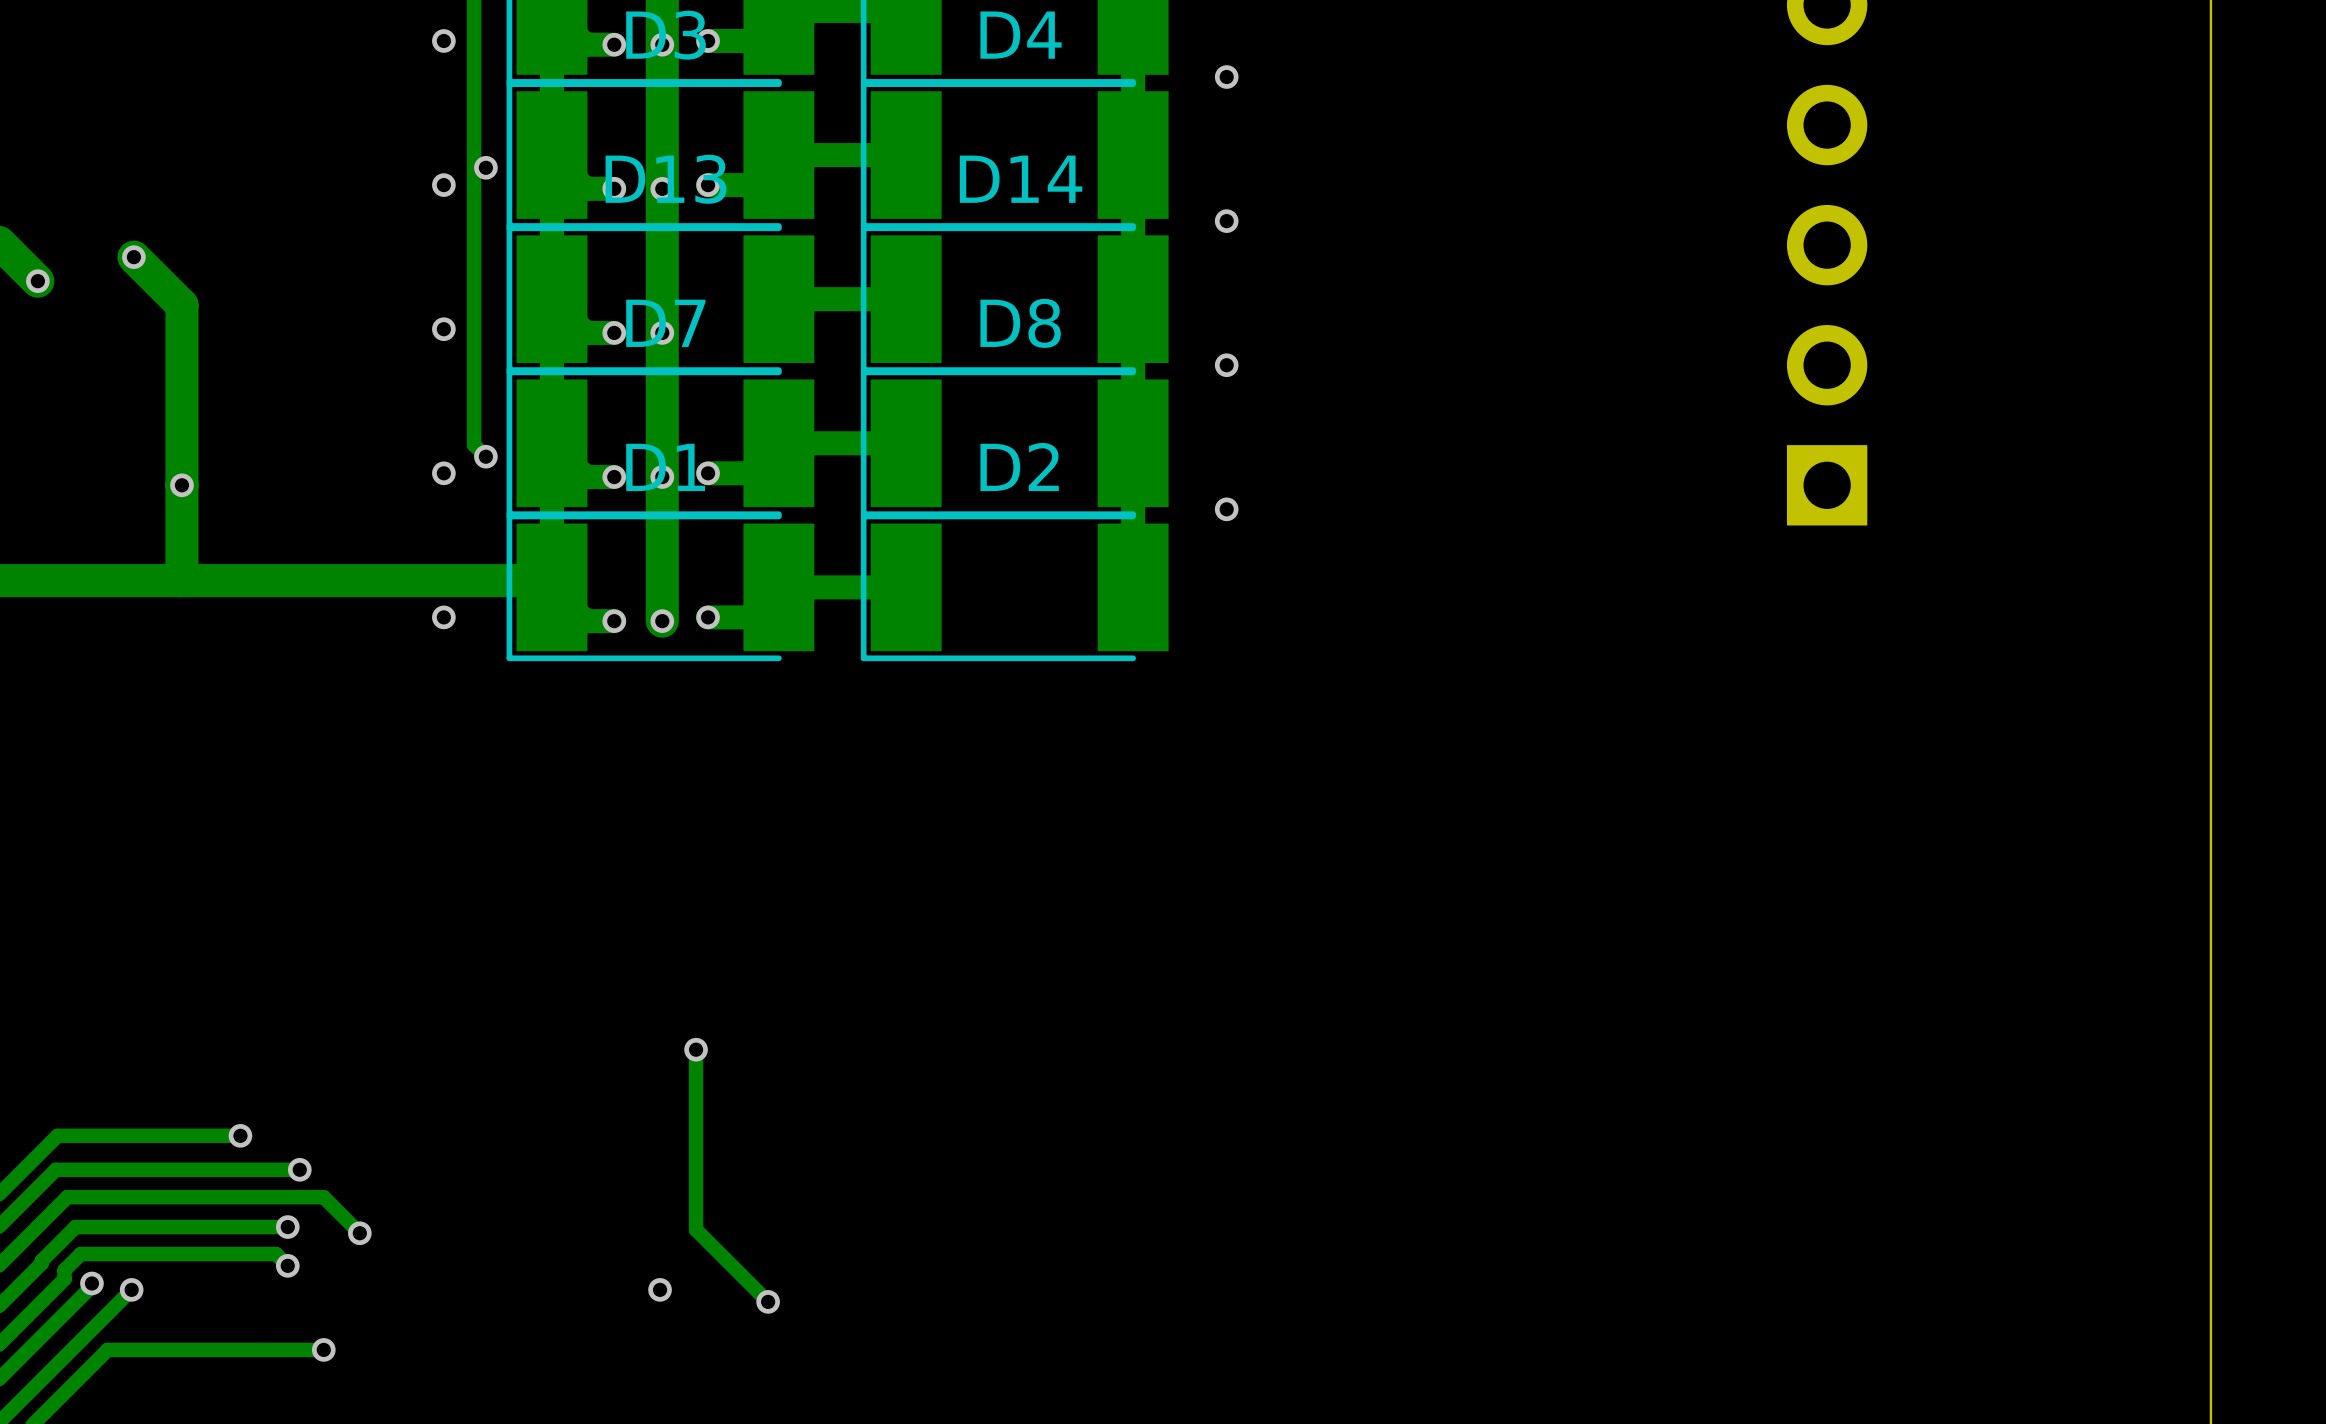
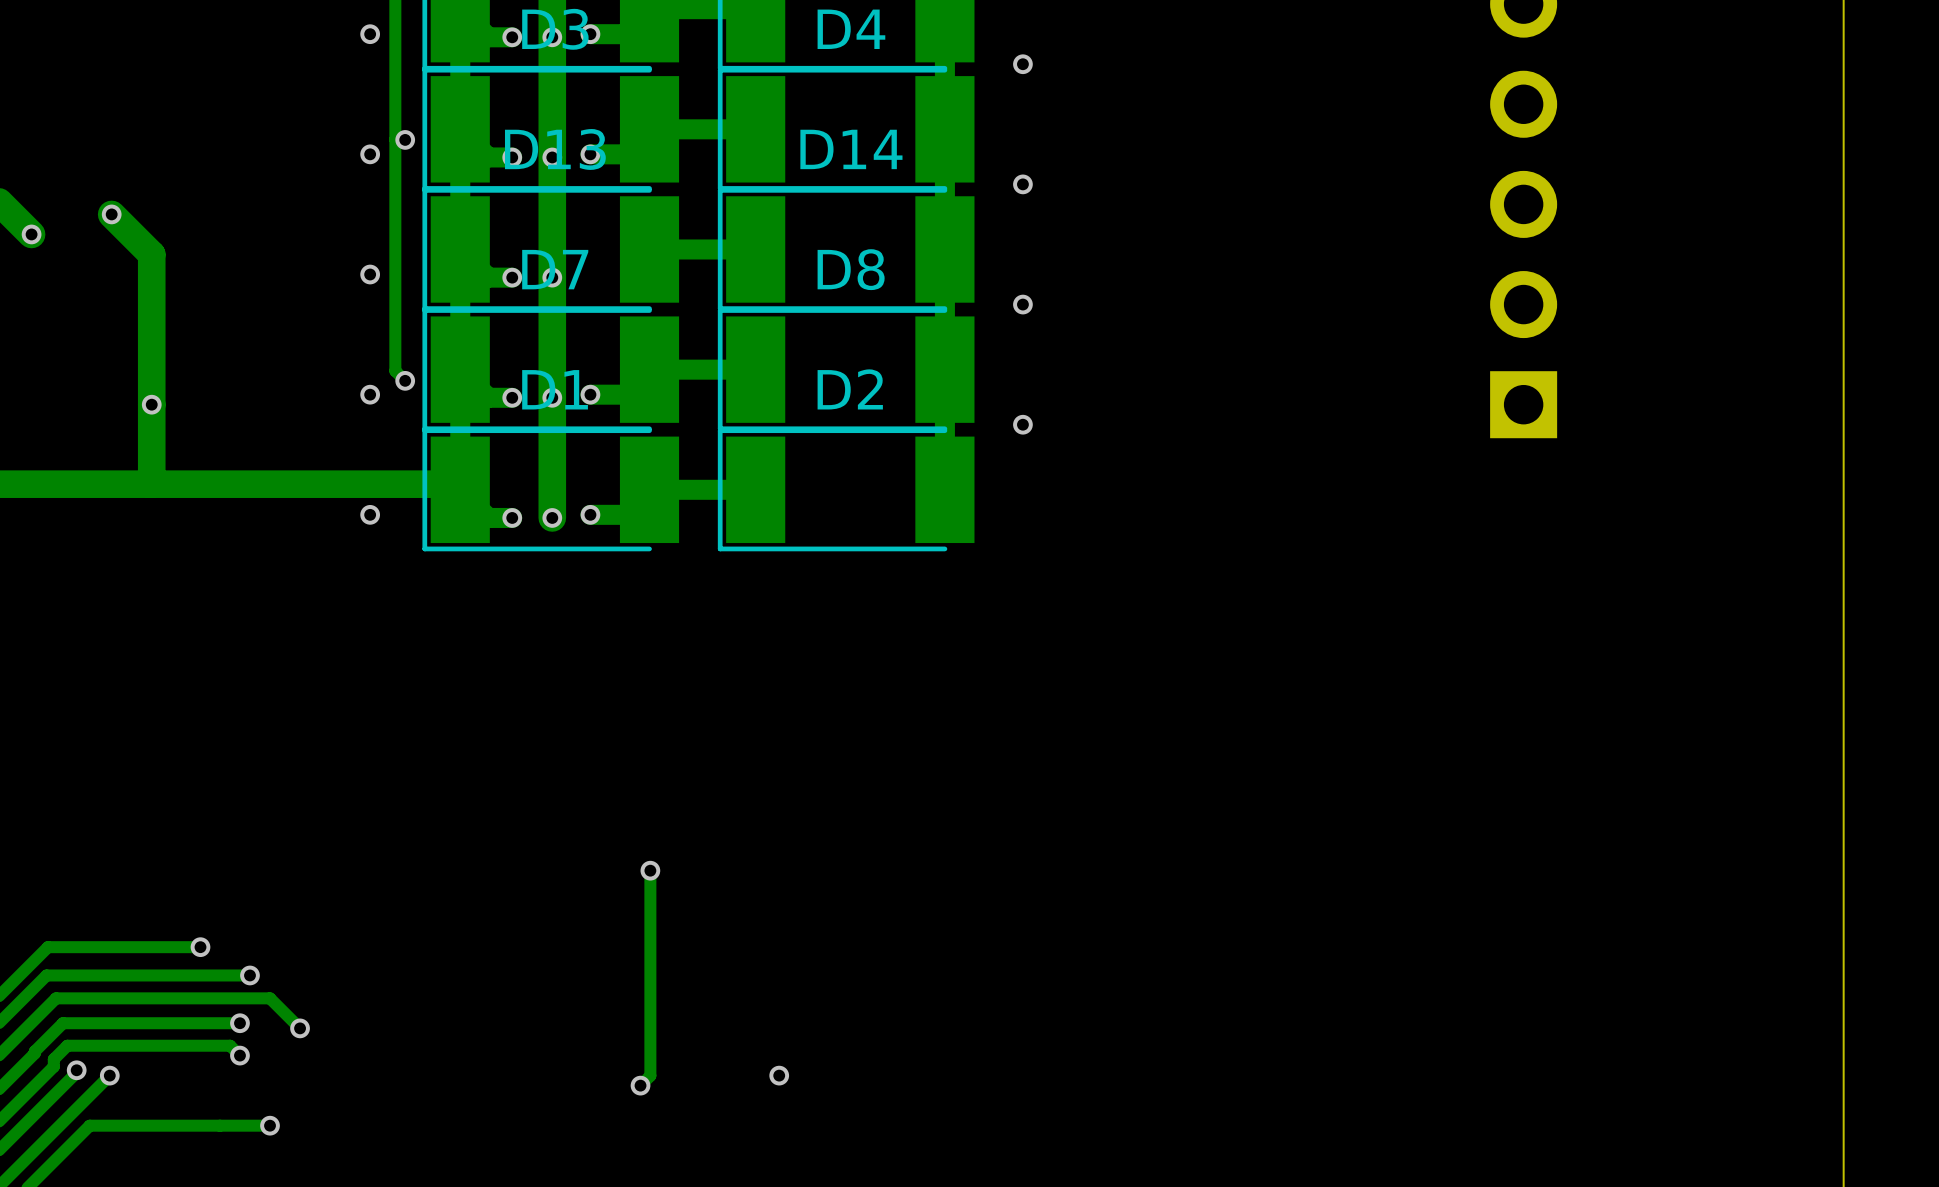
track: (696, 1049) (696, 1229) (768, 1301) -> (650, 870) (650, 1075) (640, 1085)
via position: (696, 1049) -> (650, 870)
via: (660, 1289) -> none
via: none -> (779, 1075)

